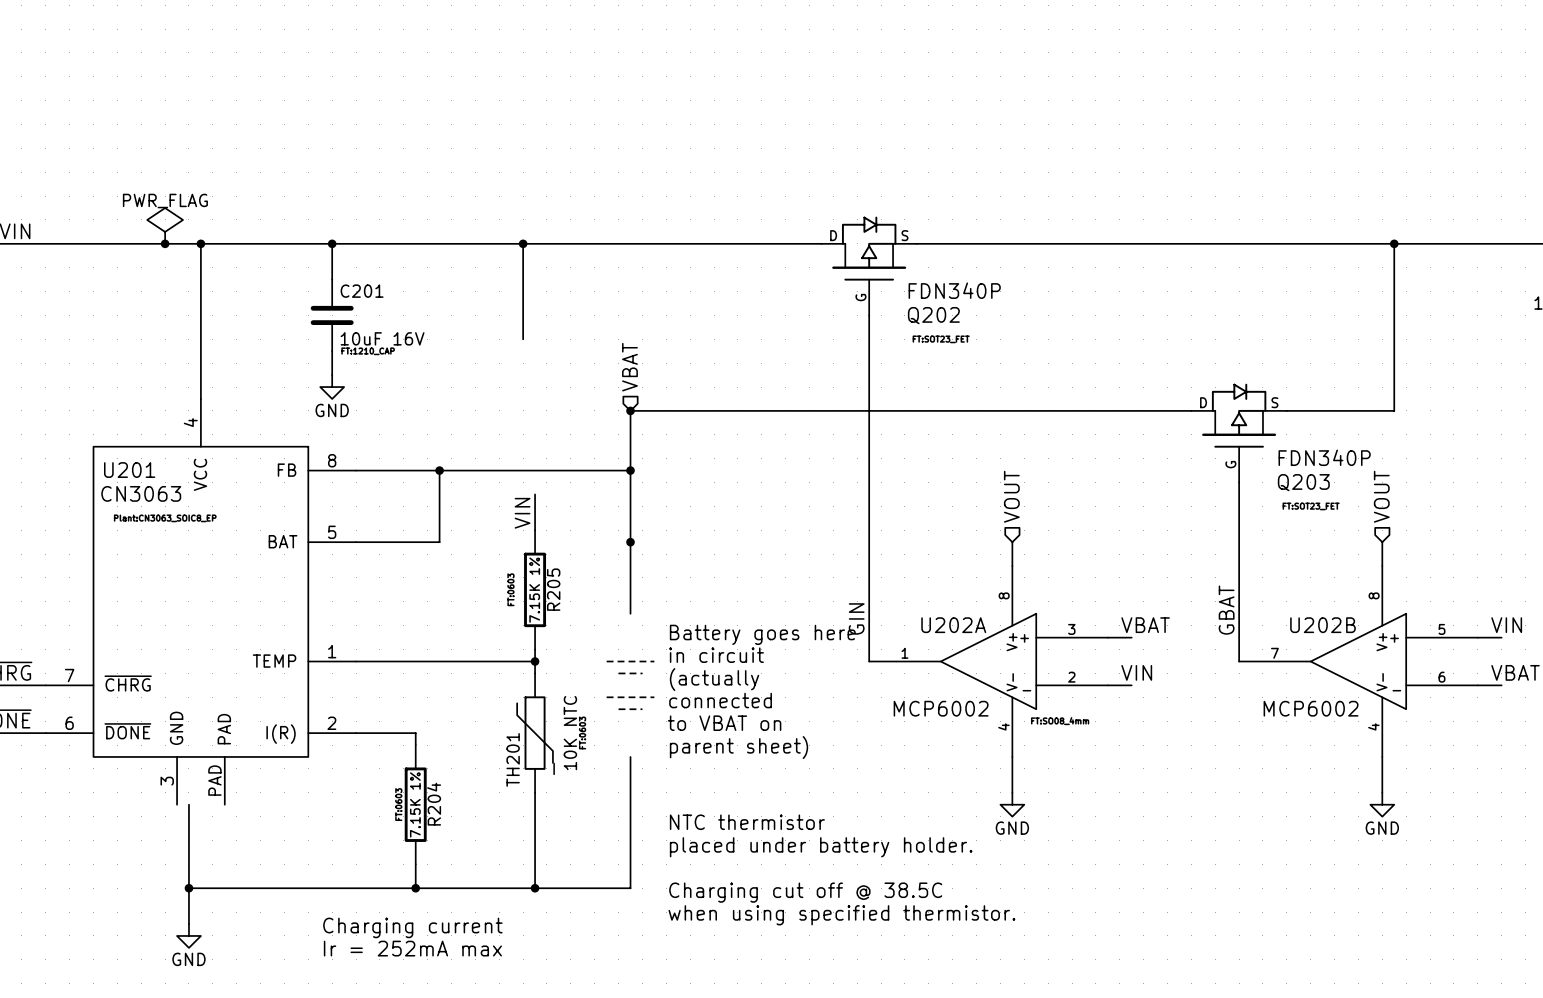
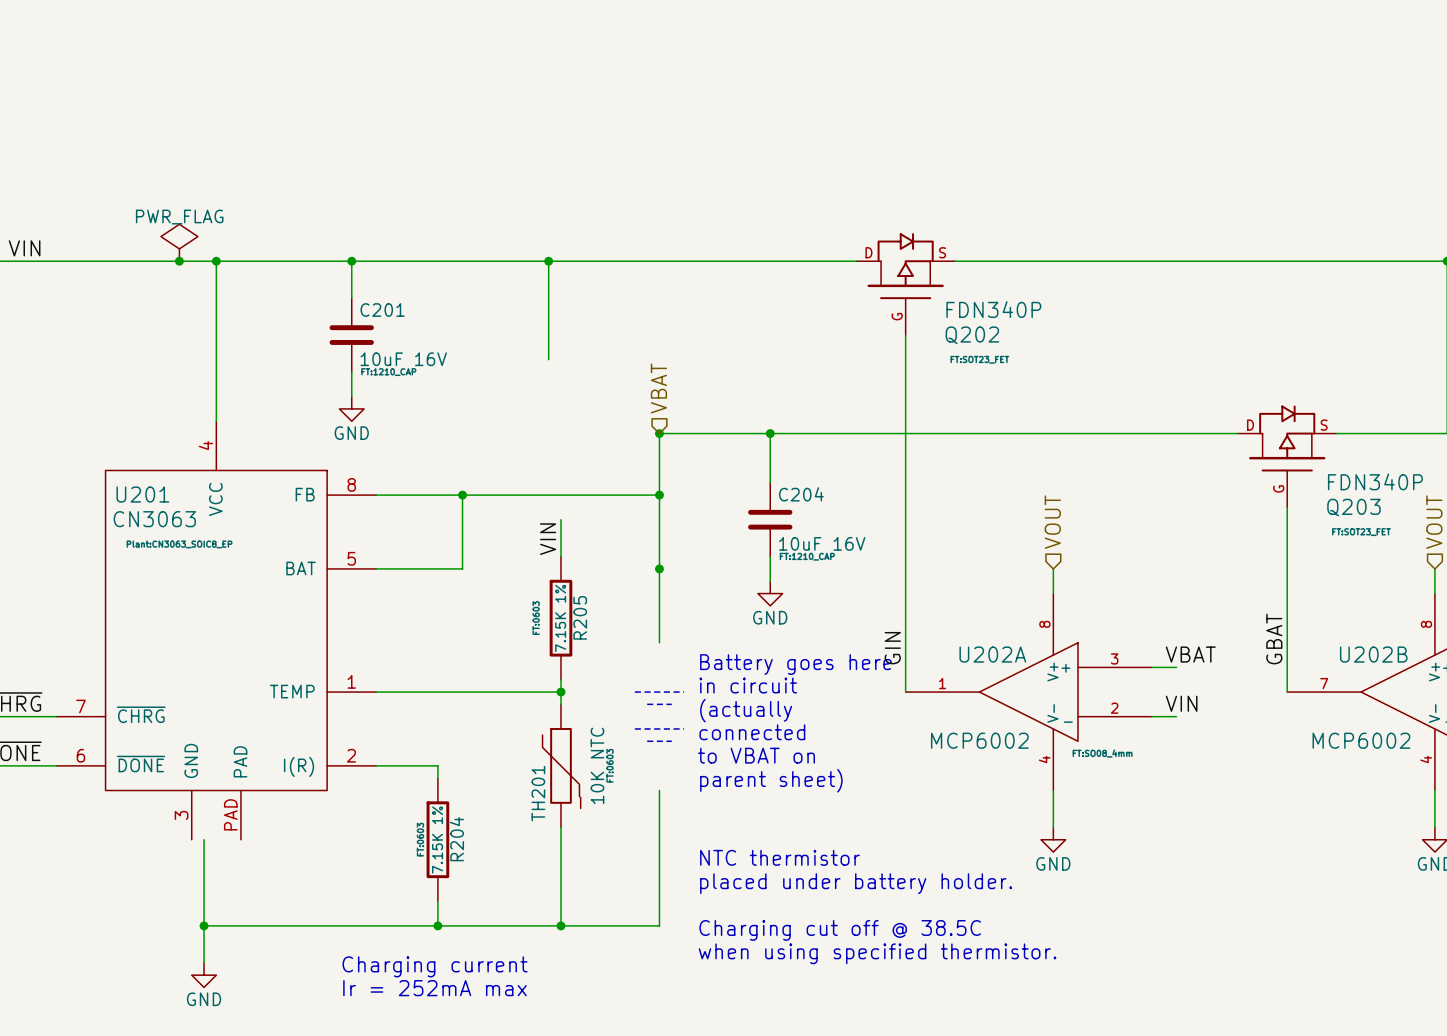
wire: none -> (770, 433) (770, 482)
junction: none -> (770, 433)
C204: none -> 10uF 16V (770, 519)
wire: none -> (770, 556) (770, 581)
power symbol: none -> GND (770, 593)

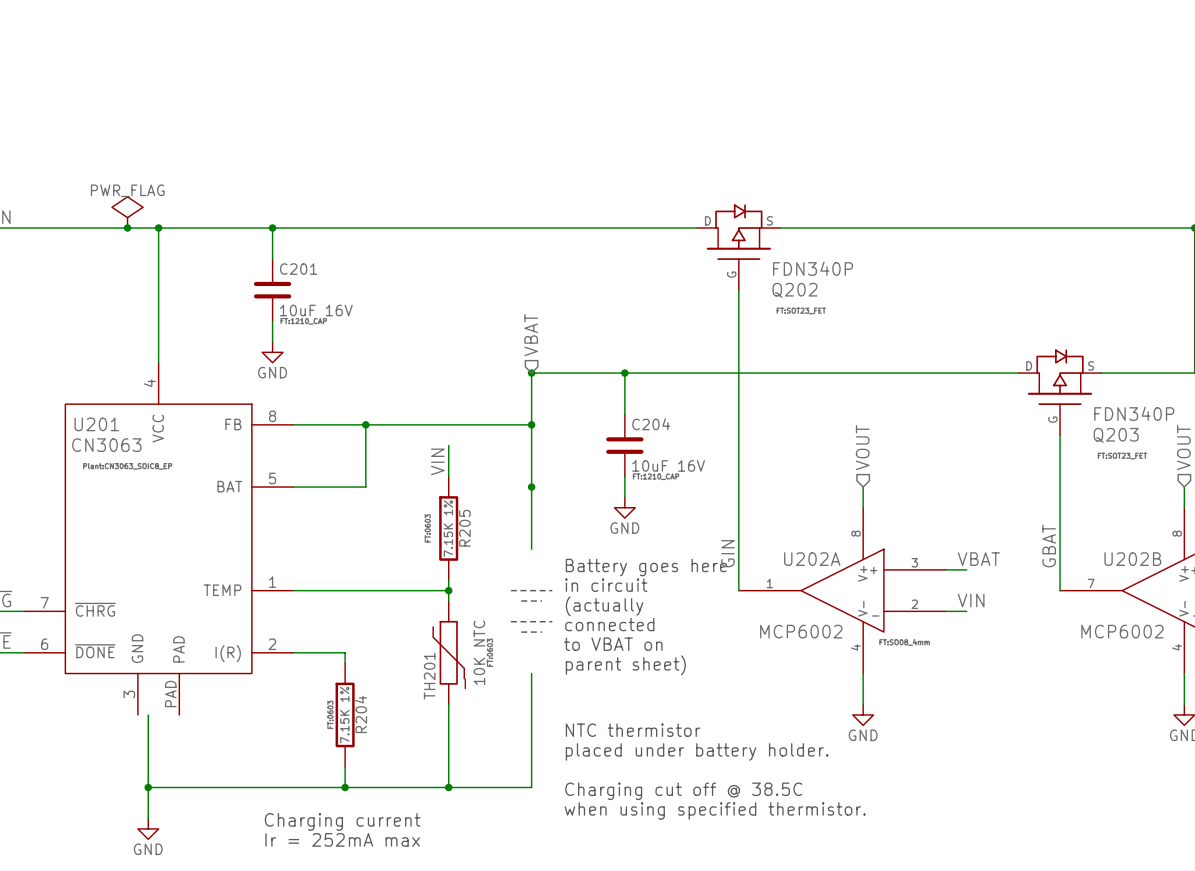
wire: (548, 261) (548, 359) -> none
junction: (548, 261) -> none

